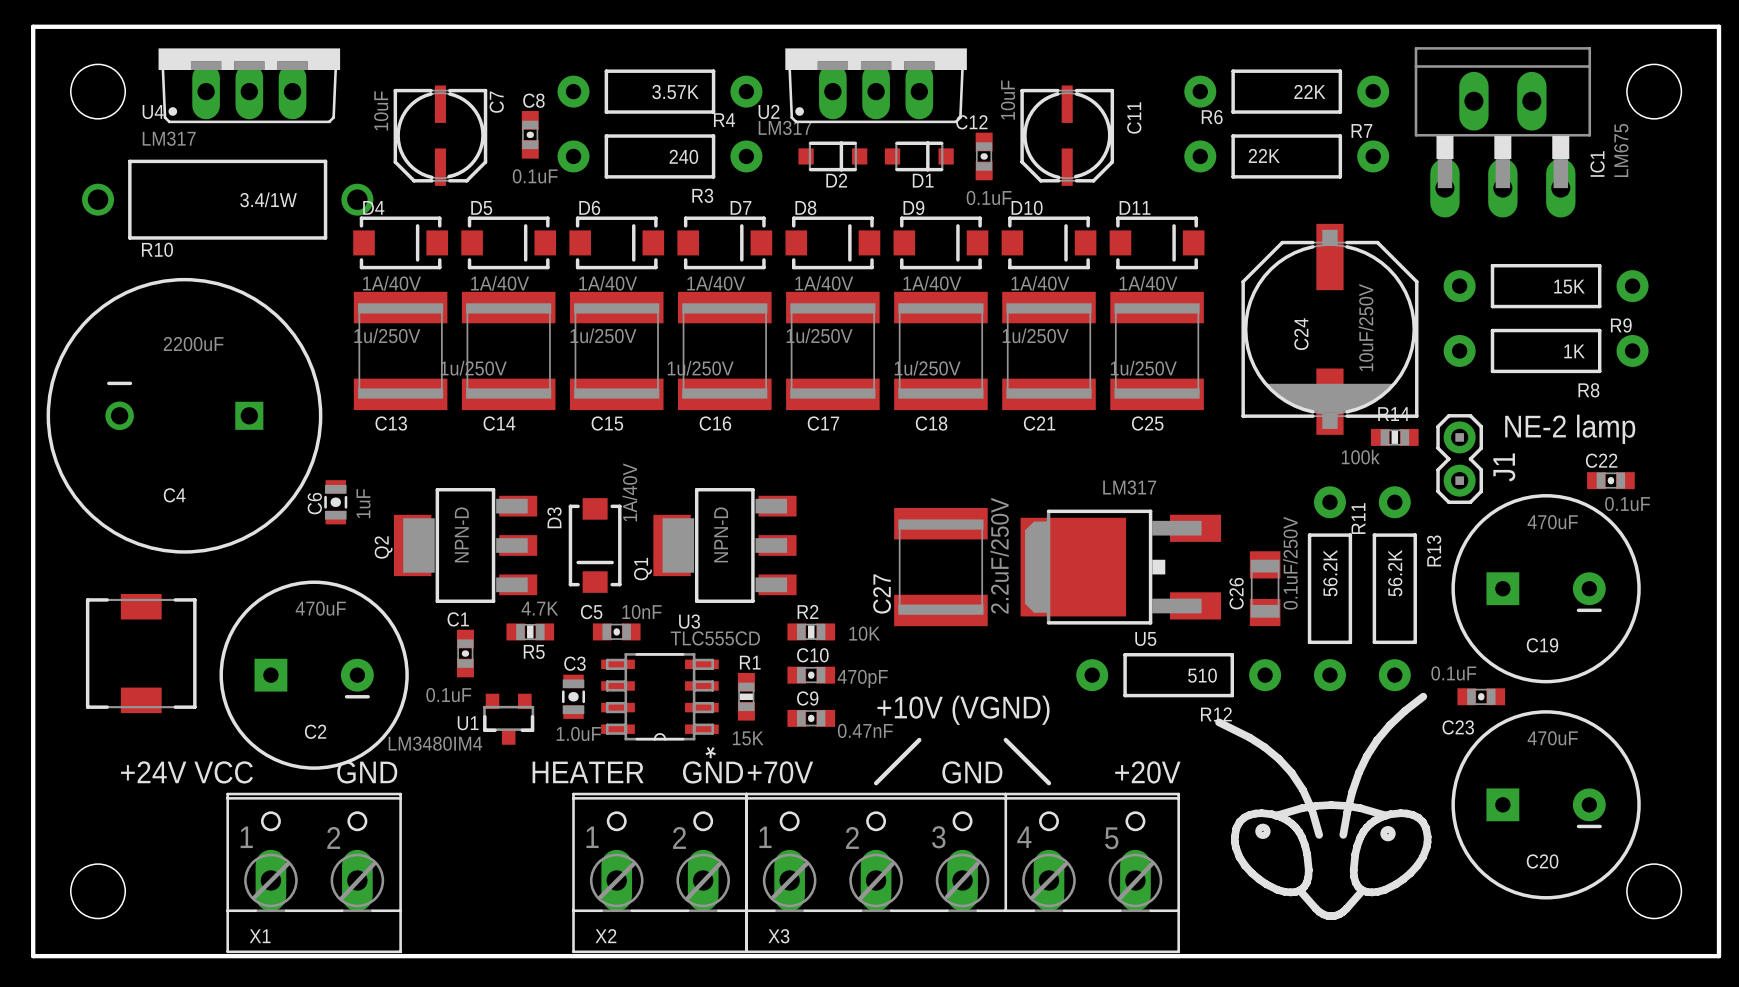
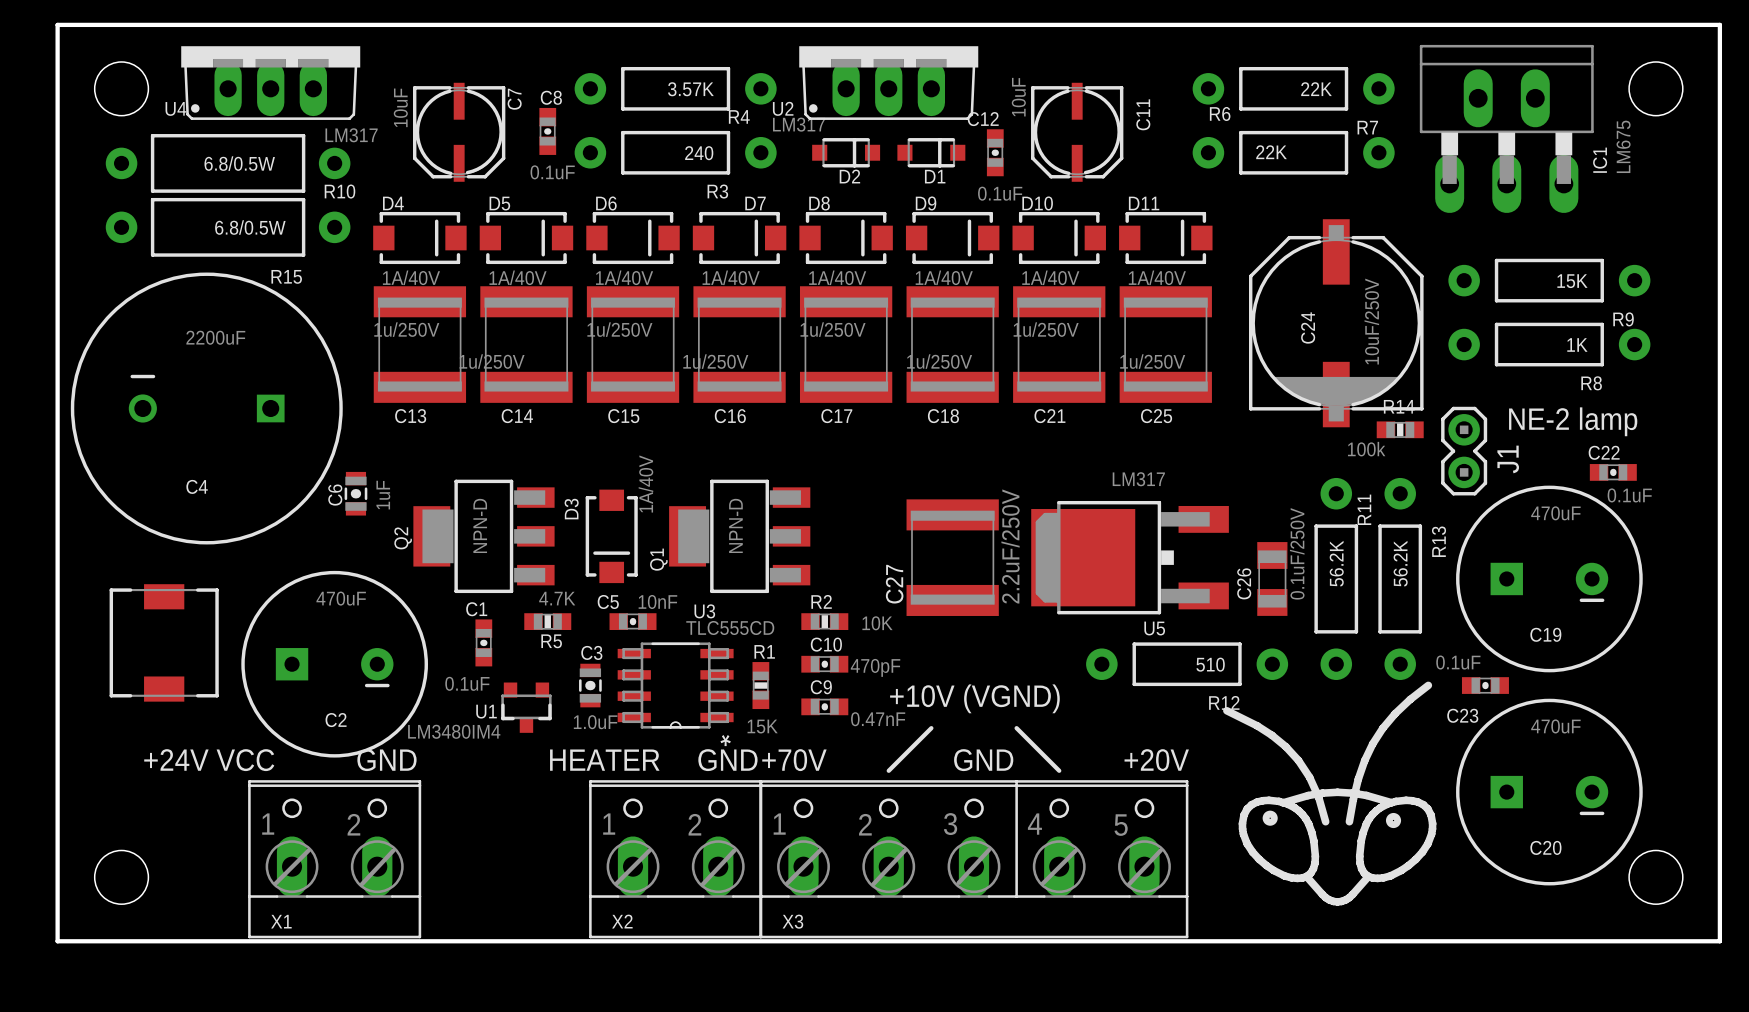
U4 value position: LM317 (169, 138) -> LM317 (351, 135)
R10 footprint: [82, 159, 374, 240] -> [105, 134, 351, 193]
R10 value: 3.4/1W (268, 199) -> 6.8/0.5W (239, 163)
R15: none -> 6.8/0.5W (228, 227)
R10 name position: R10 (157, 249) -> R10 (339, 191)

